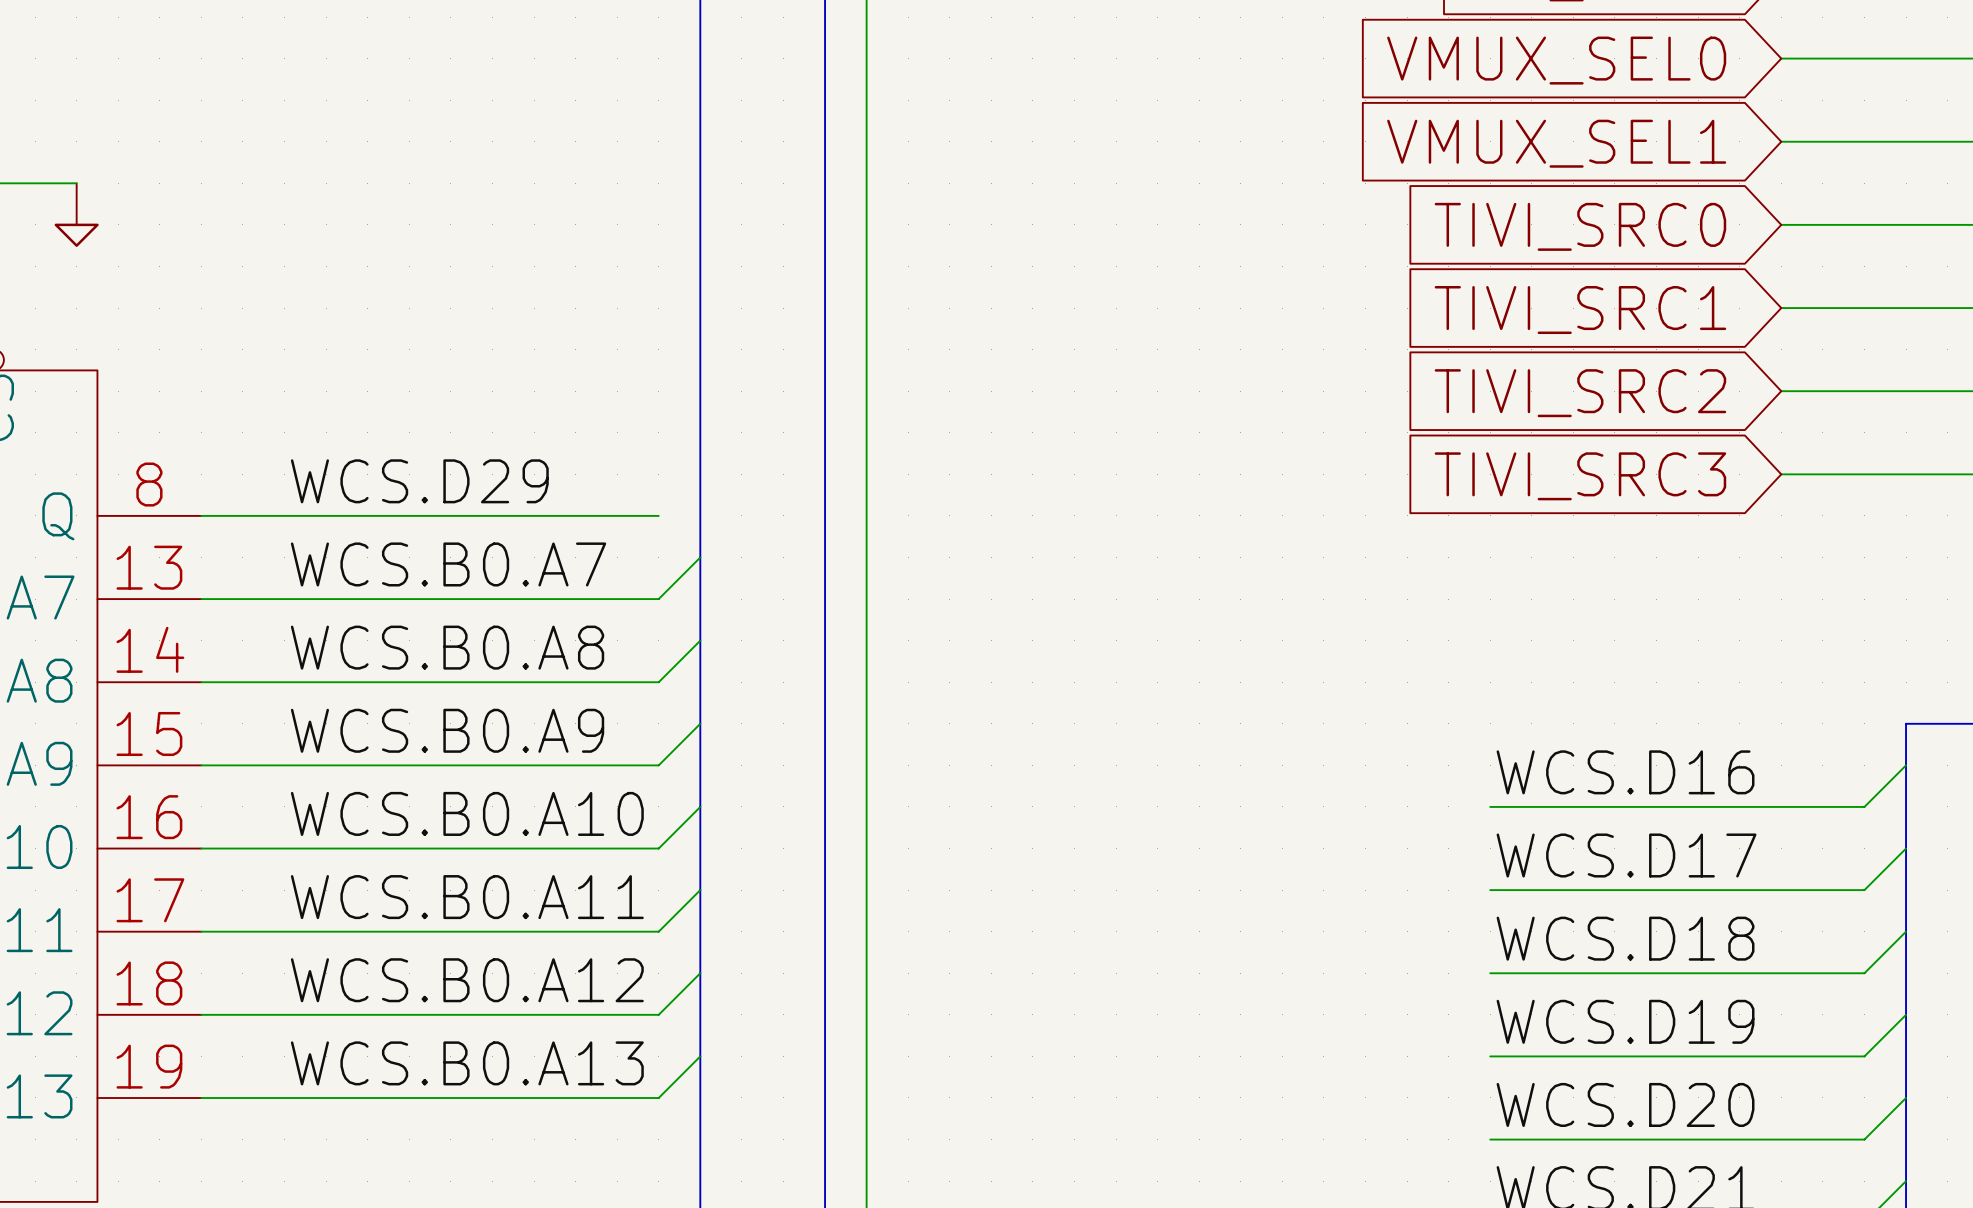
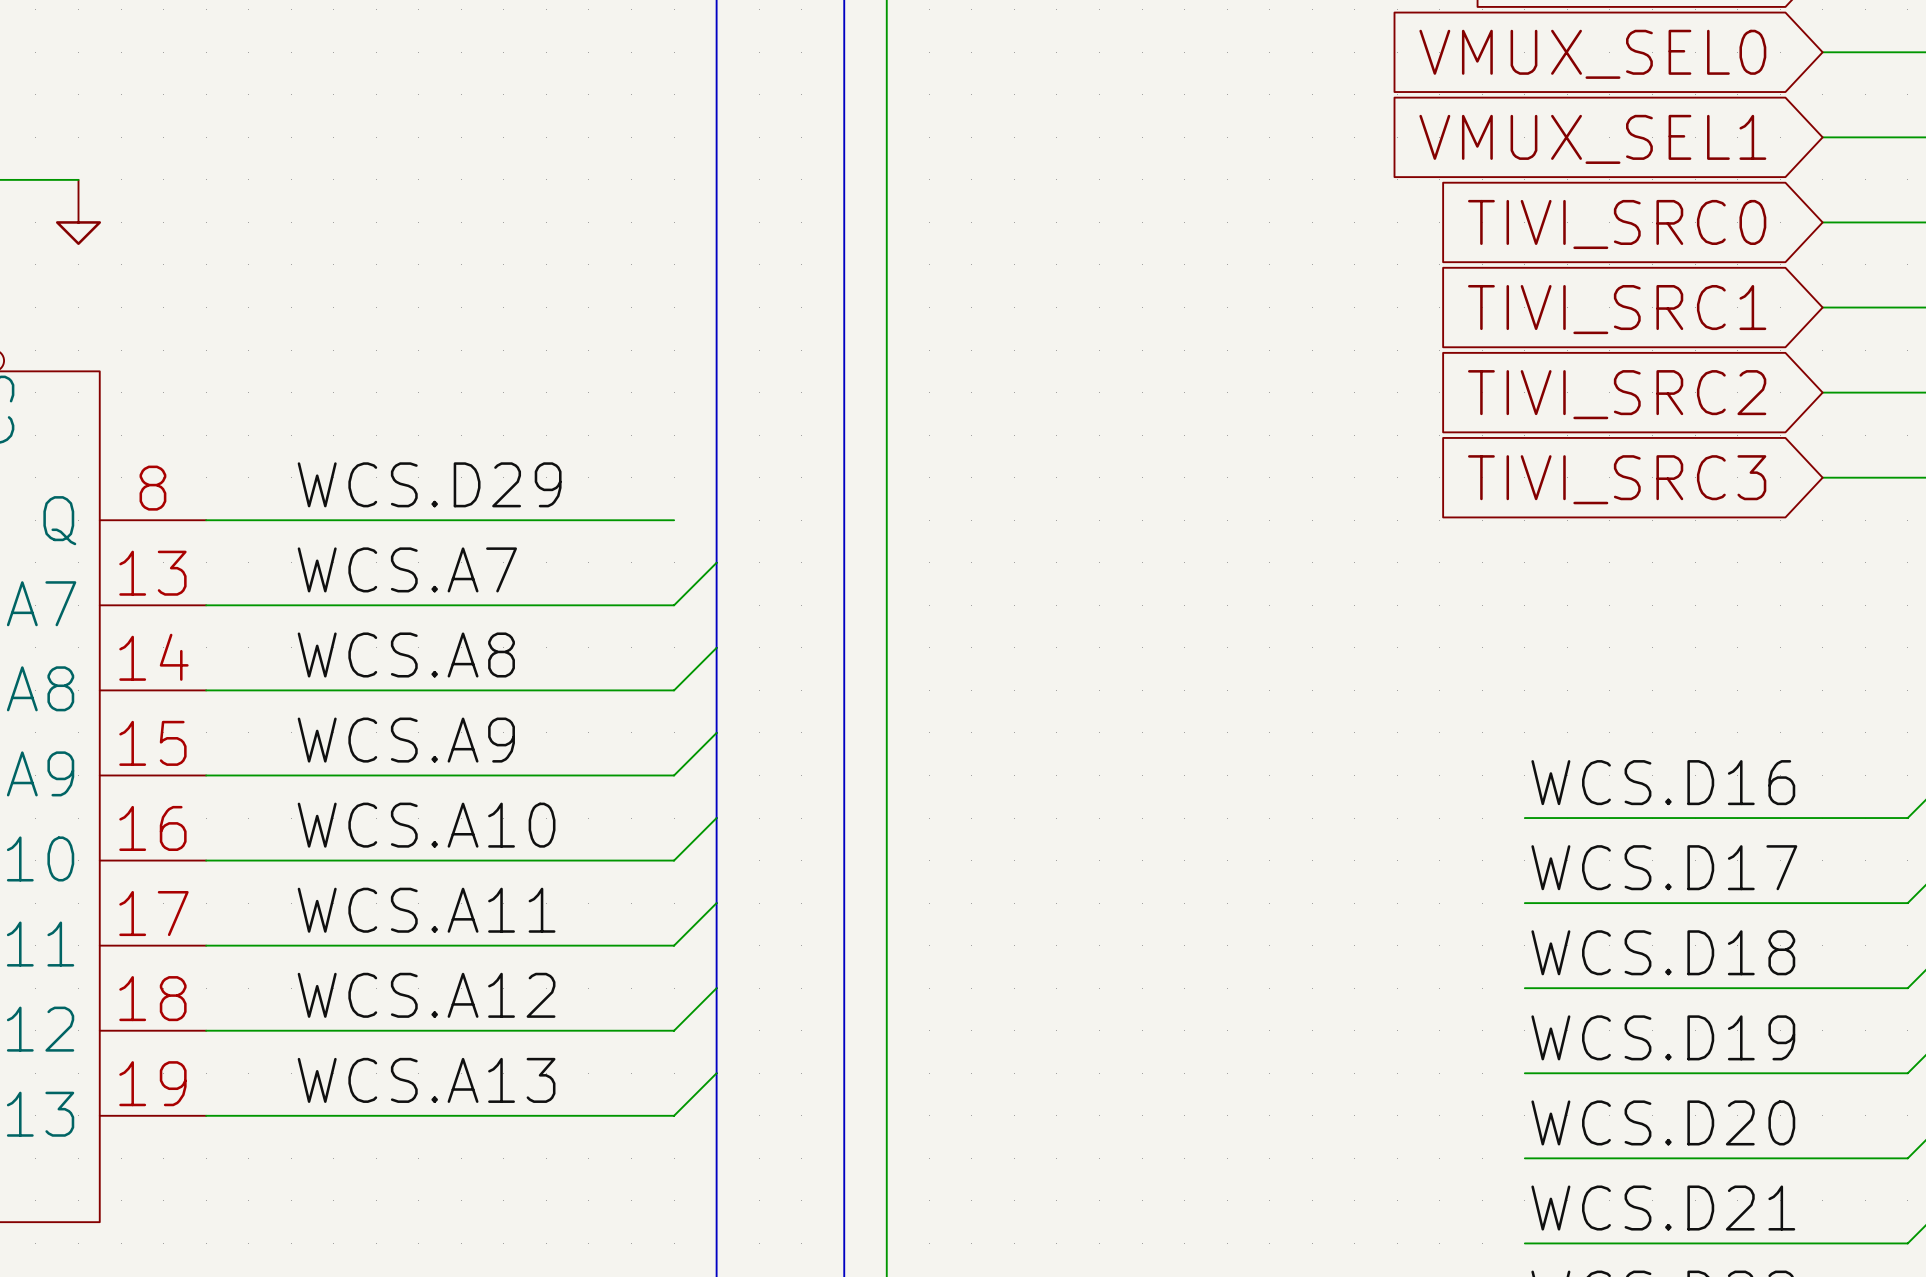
label: WCS.B0.A7 (448, 564) -> WCS.A7 (407, 569)
label: WCS.B0.A8 (447, 647) -> WCS.A8 (406, 654)
label: WCS.B0.A9 (447, 730) -> WCS.A9 (406, 740)
label: WCS.B0.A10 (467, 813) -> WCS.A10 (426, 825)
label: WCS.B0.A11 (467, 897) -> WCS.A11 (426, 910)
label: WCS.B0.A12 (467, 980) -> WCS.A12 (426, 995)
label: WCS.B0.A13 (467, 1063) -> WCS.A13 (426, 1080)

